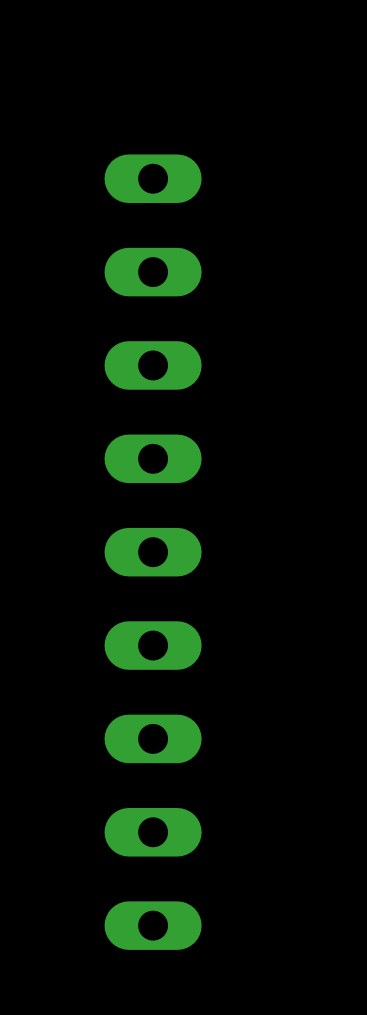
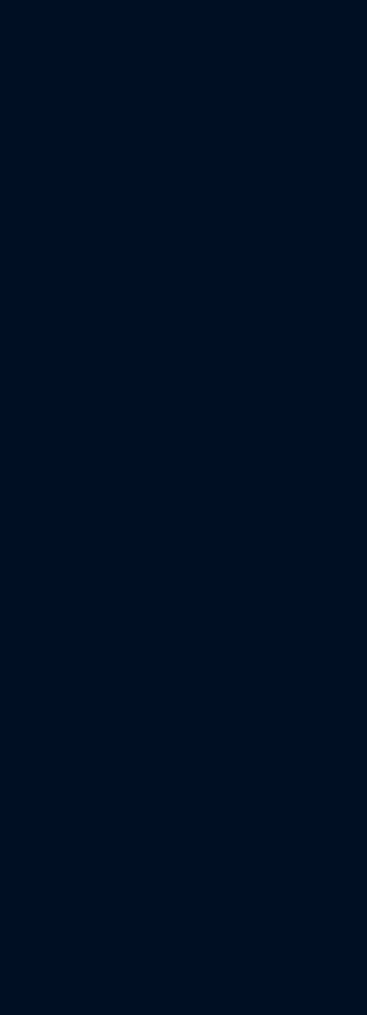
part: (153, 552) -> none

